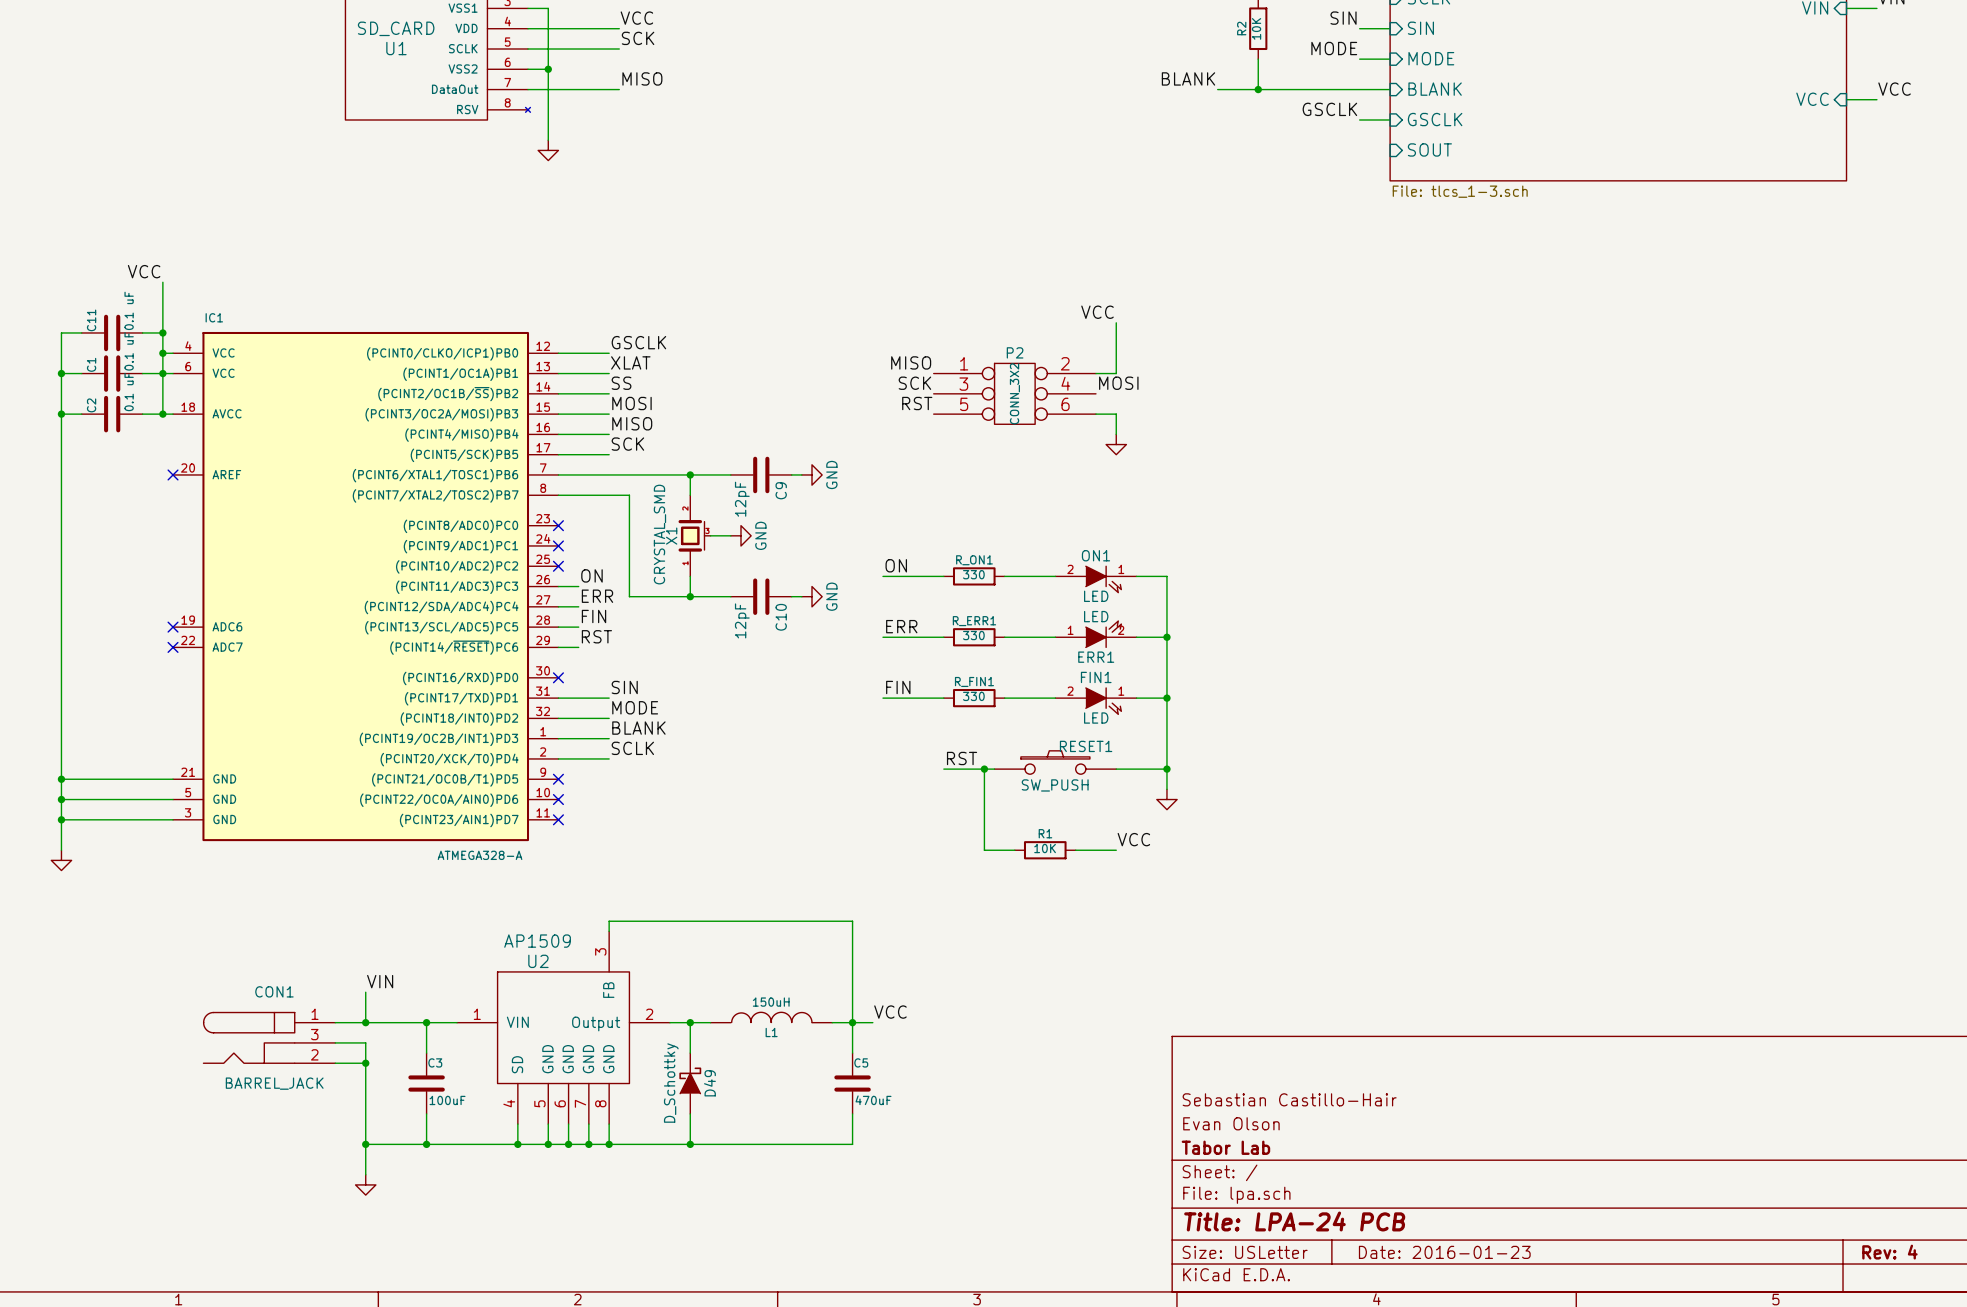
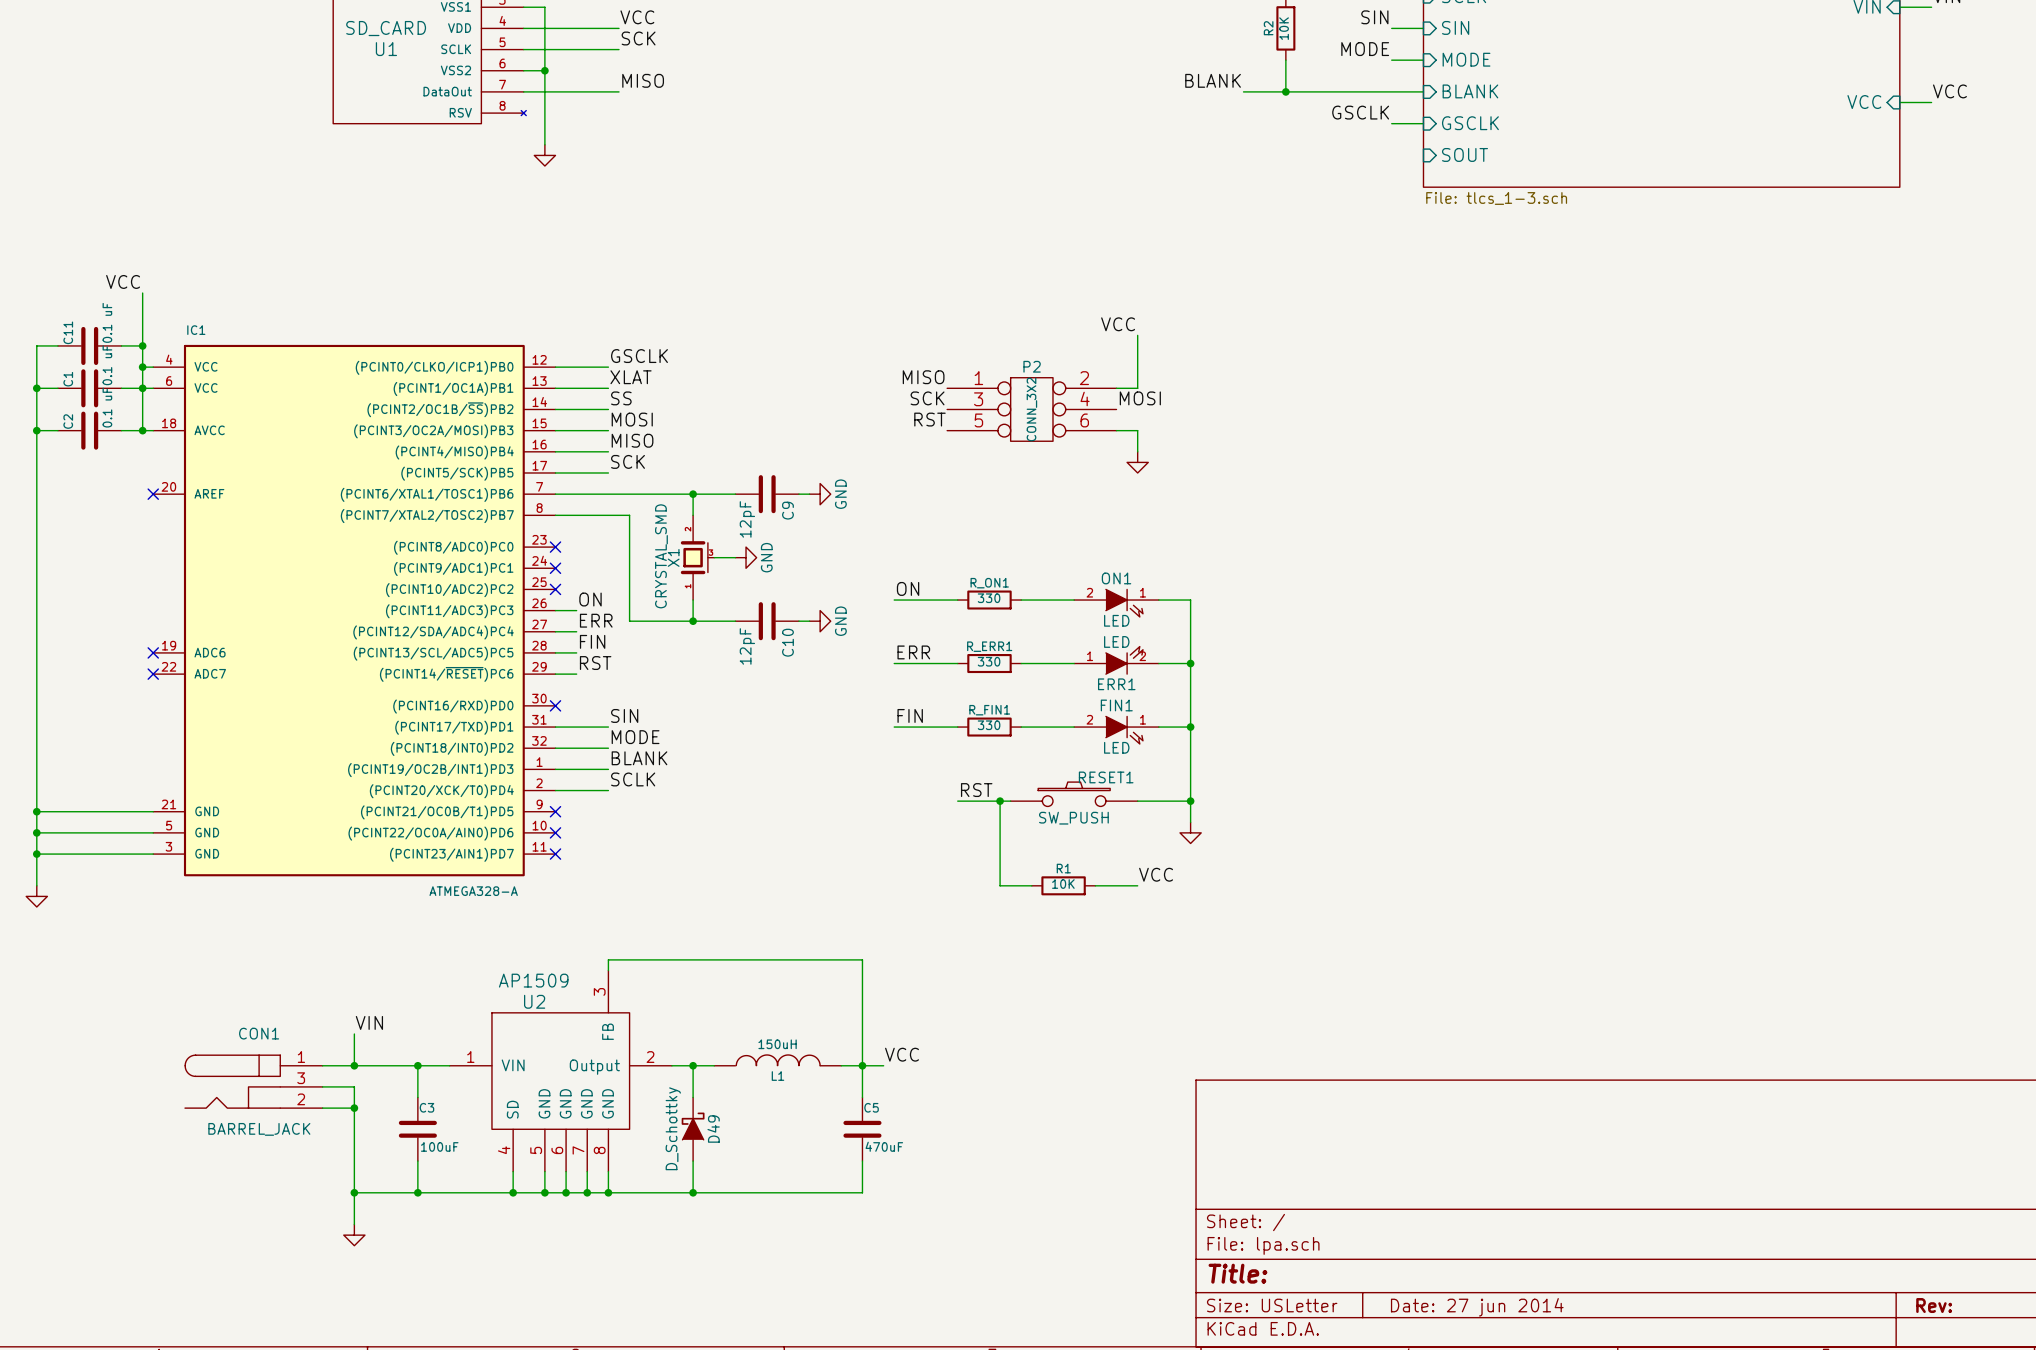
title block: Sebastian Castillo-Hair (1289, 1099) -> none
title block: Evan Olson (1231, 1123) -> none
title block: Tabor Lab (1225, 1147) -> none
title block: Title: LPA-24 PCB (1294, 1221) -> Title: (1237, 1273)
title block: Date: 2016-01-23 (1444, 1252) -> Date: 27 jun 2014 (1477, 1307)
title block: Rev: 4 (1889, 1252) -> Rev: (1934, 1305)

